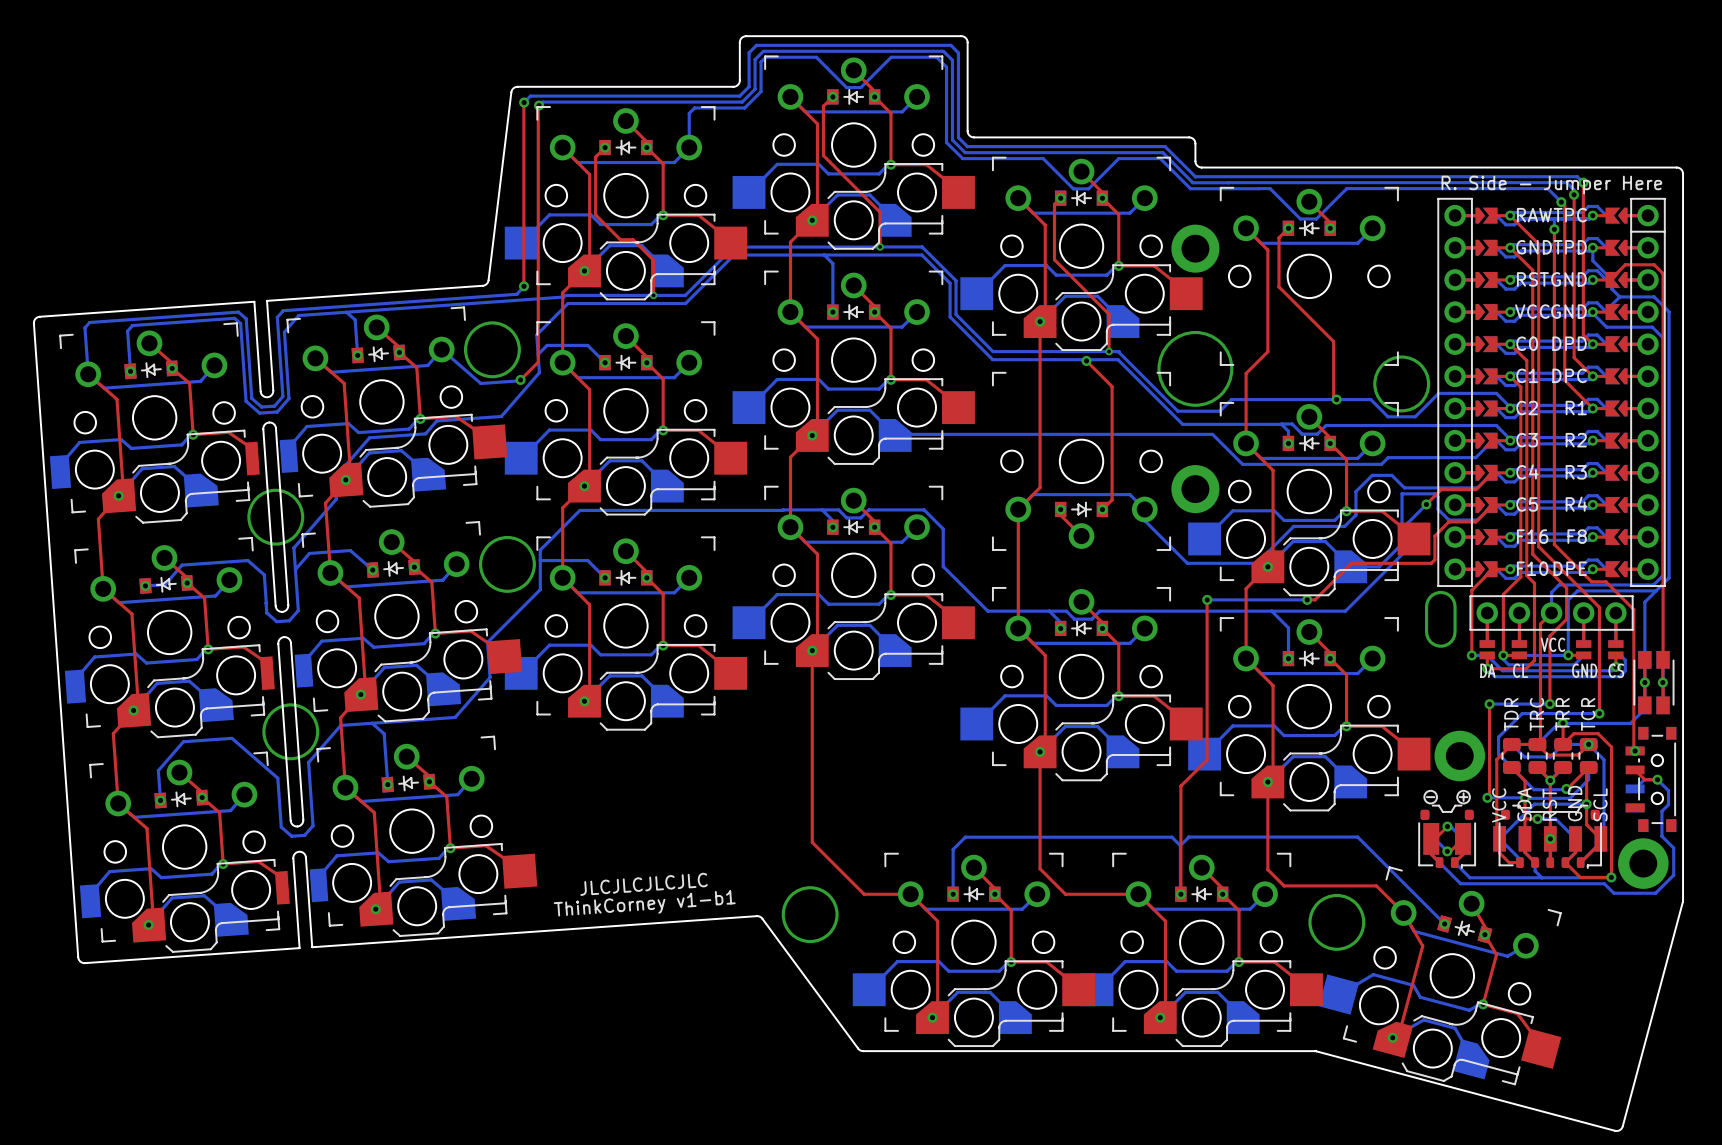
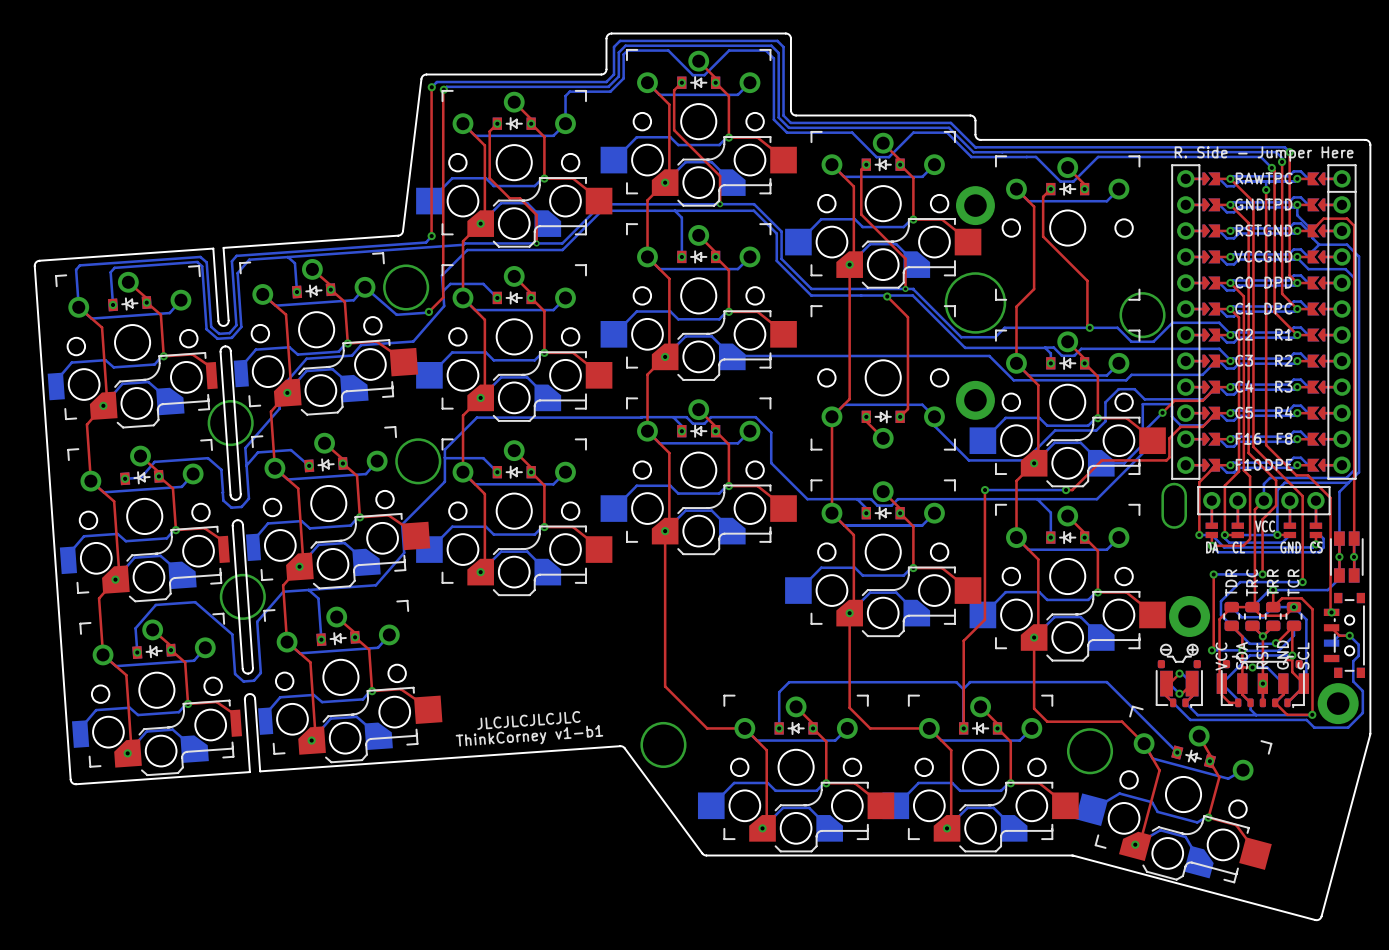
top track: none -> (1286, 660) (1292, 660)

